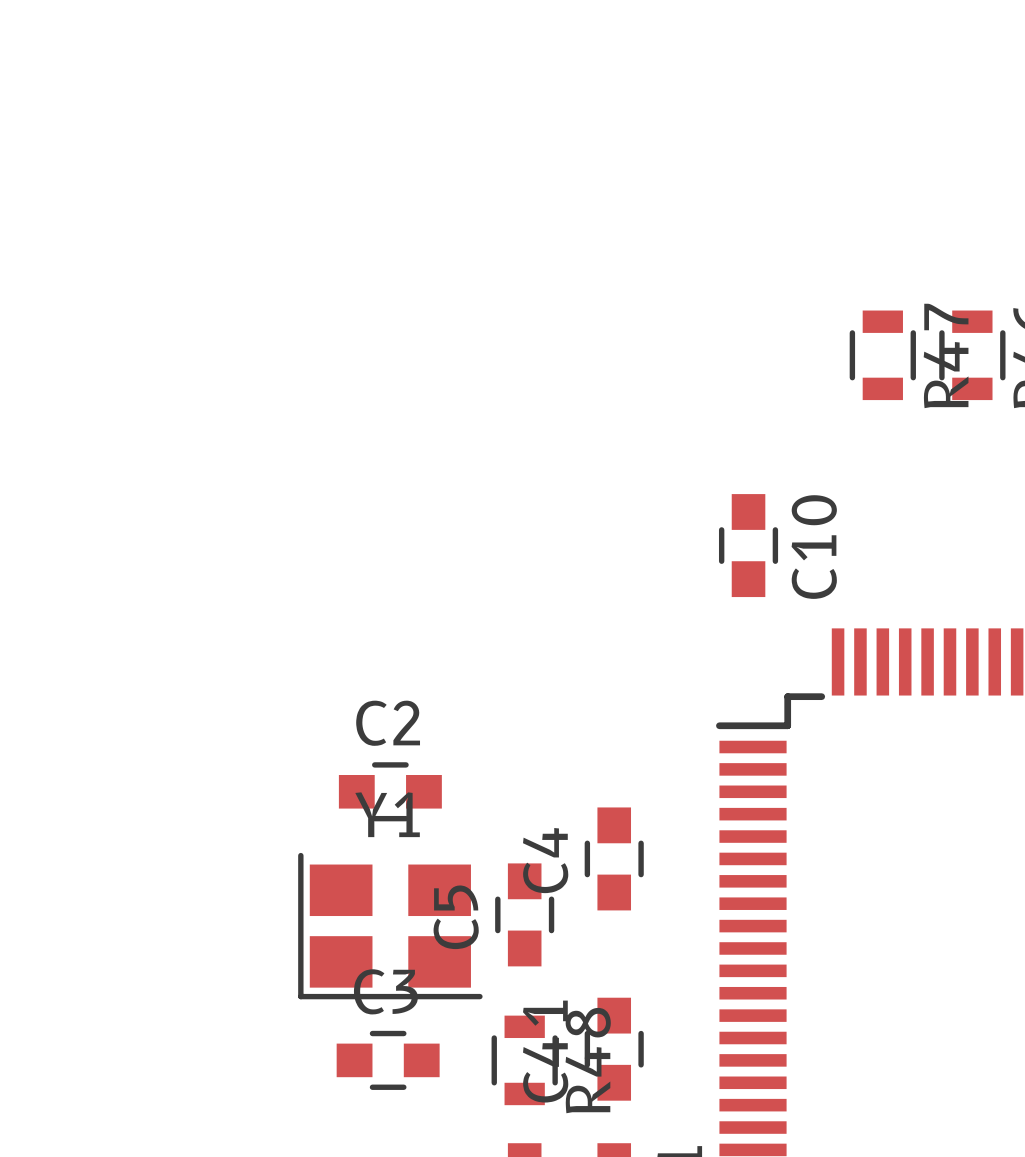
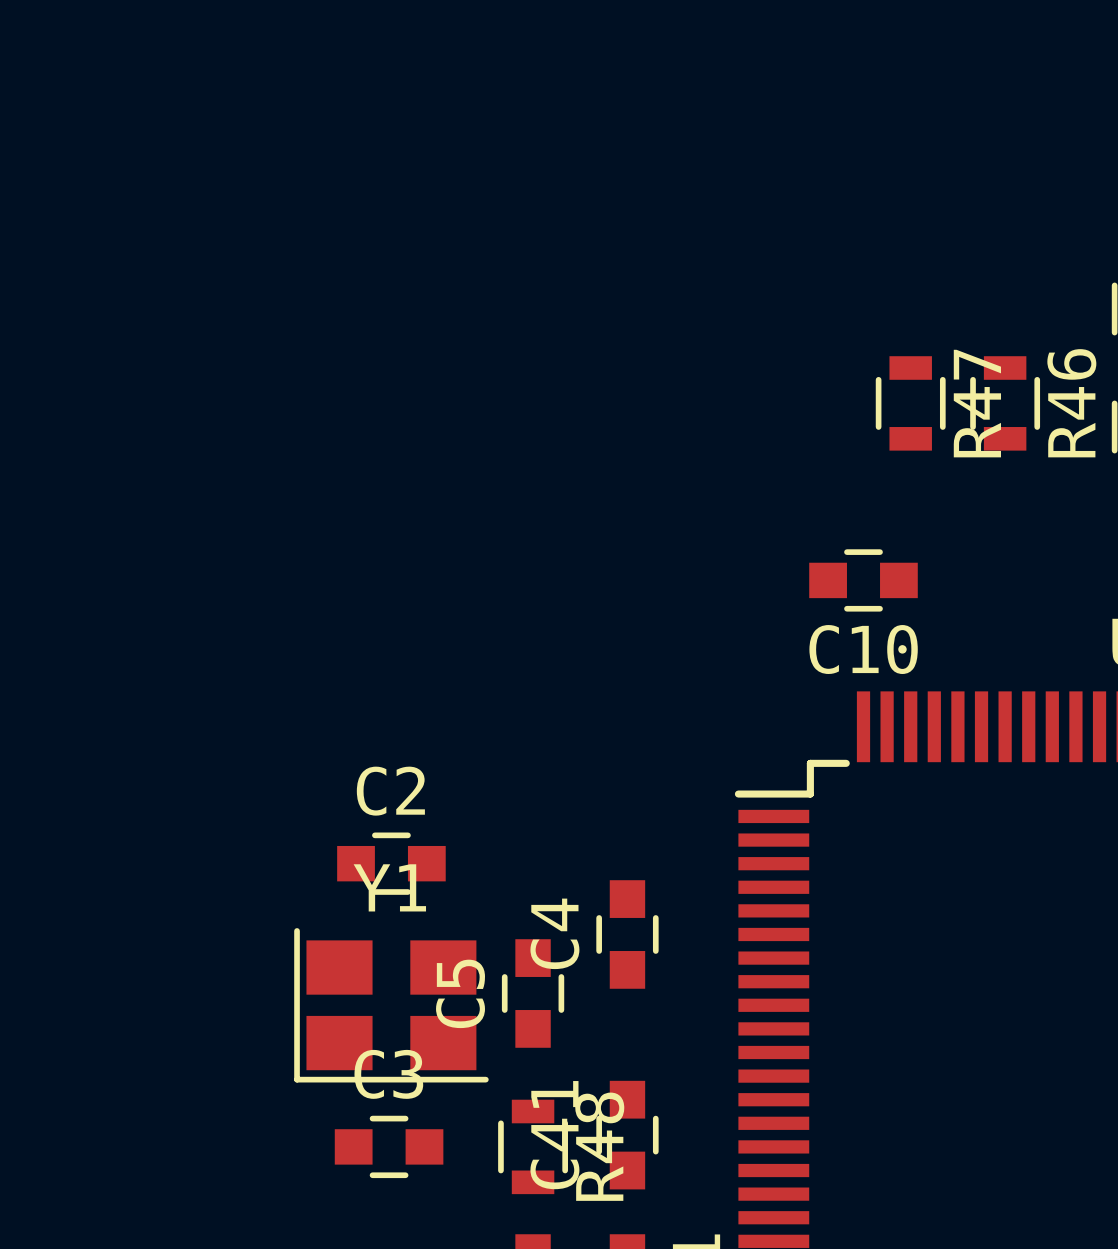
C10 rotation: 0° (748, 545) -> 90° clockwise (863, 580)
C10 position: (748, 545) -> (863, 580)

